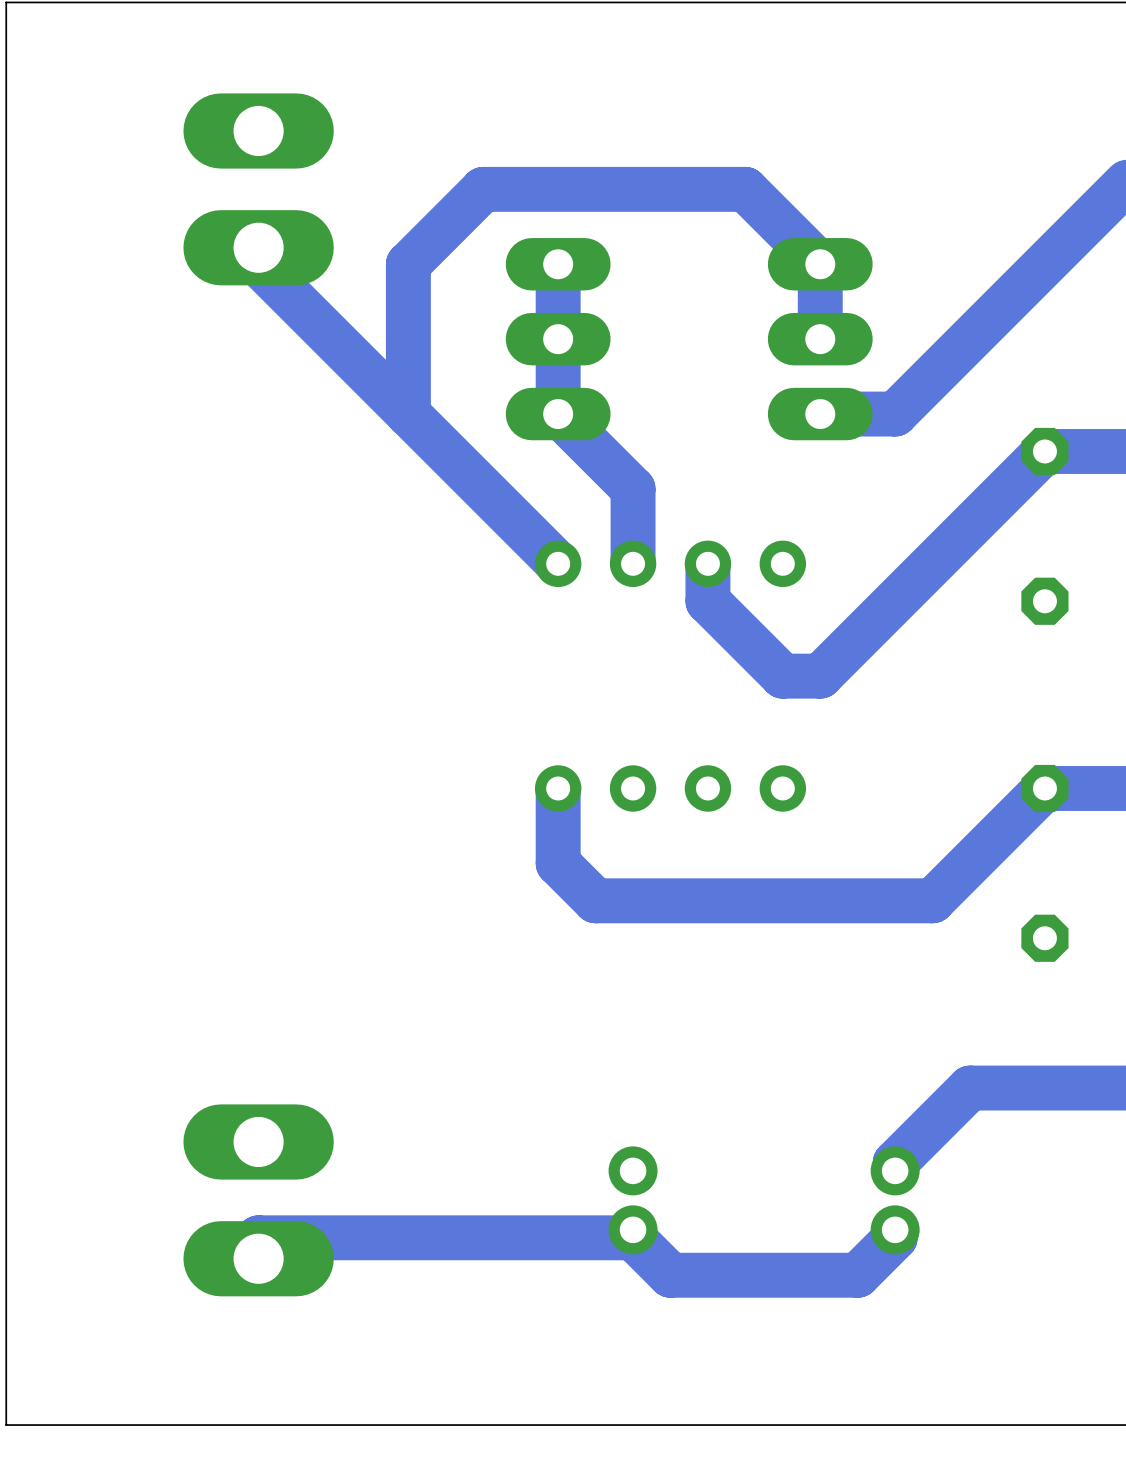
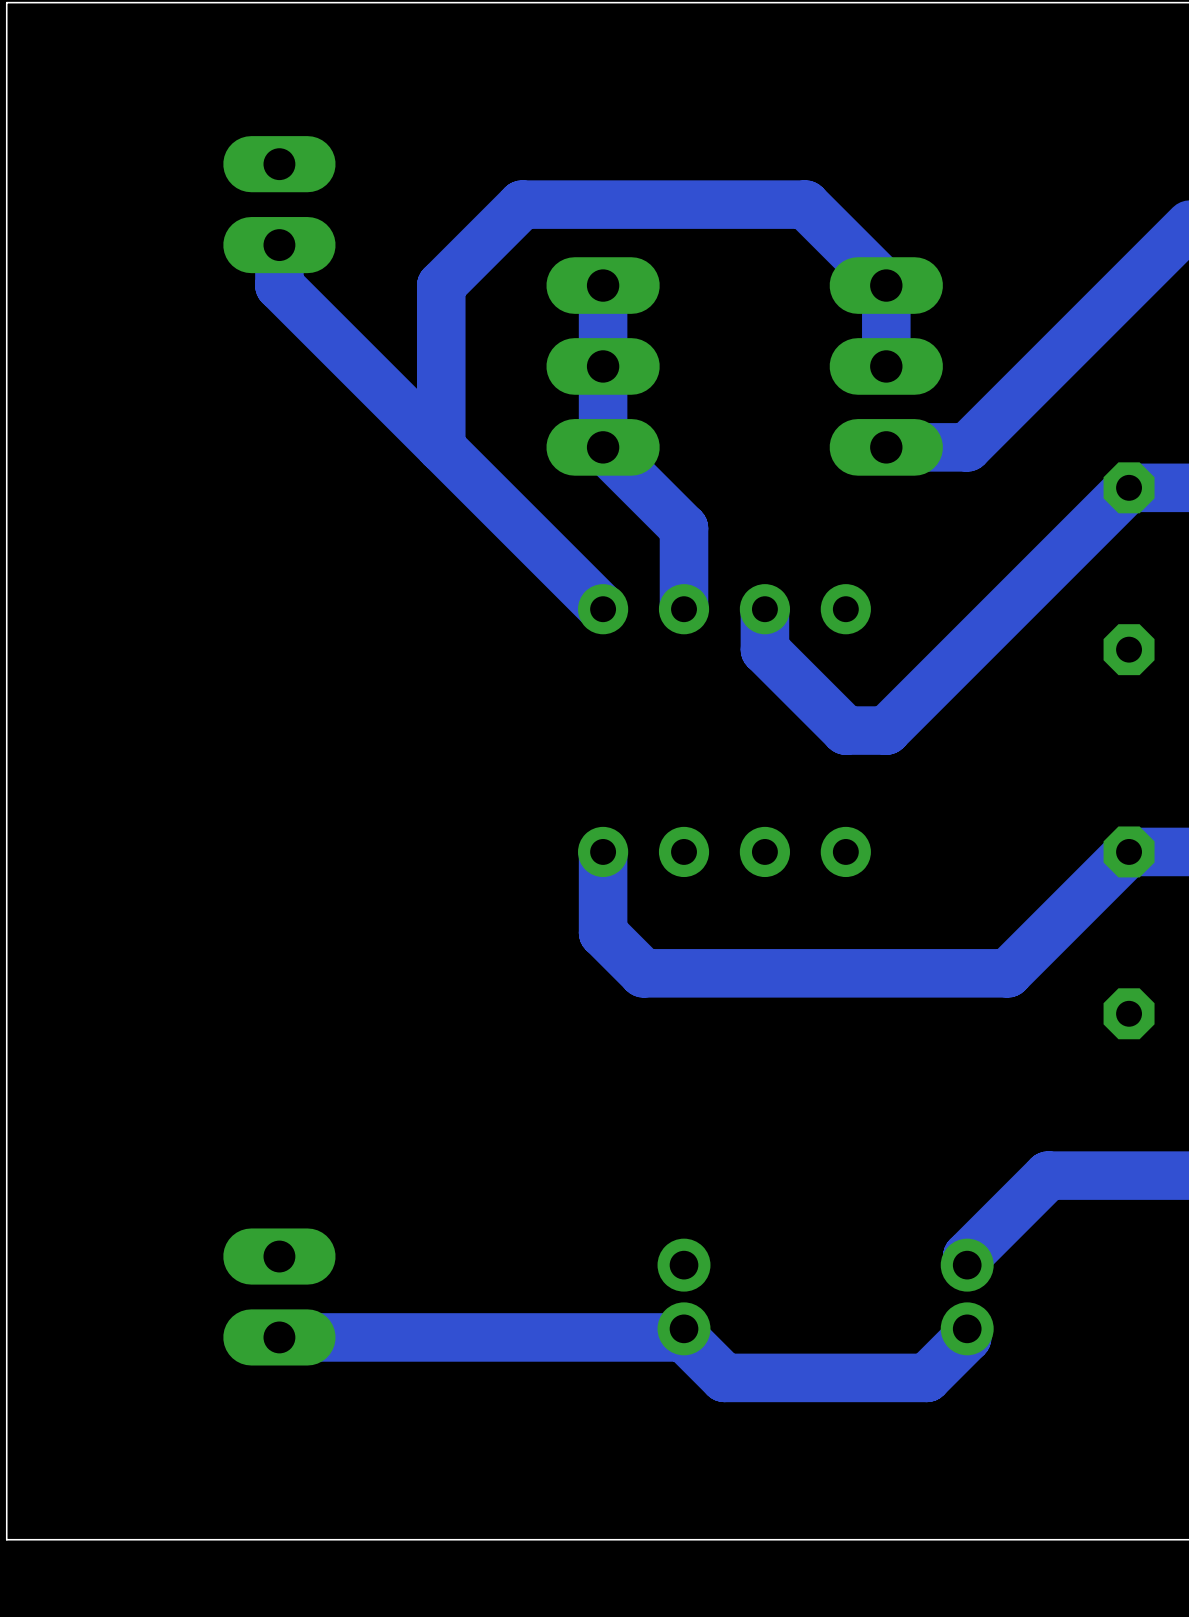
part footprint: [183, 93, 334, 286] -> [223, 136, 336, 274]
part footprint: [183, 1104, 334, 1297] -> [223, 1228, 336, 1366]

